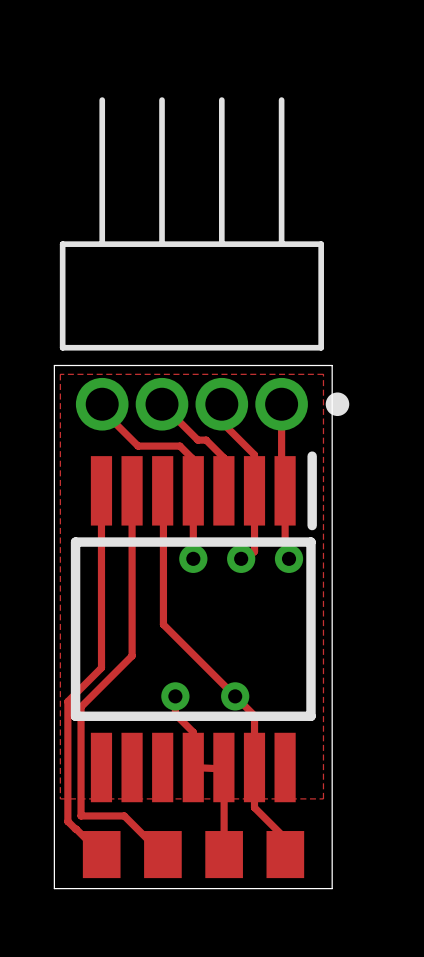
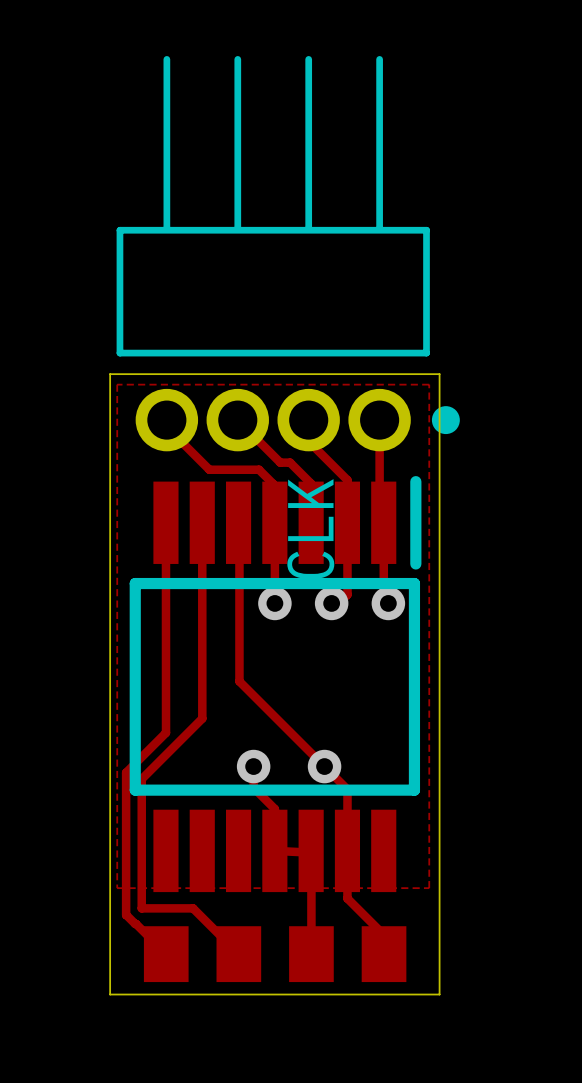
text: none -> CLK (310, 529)

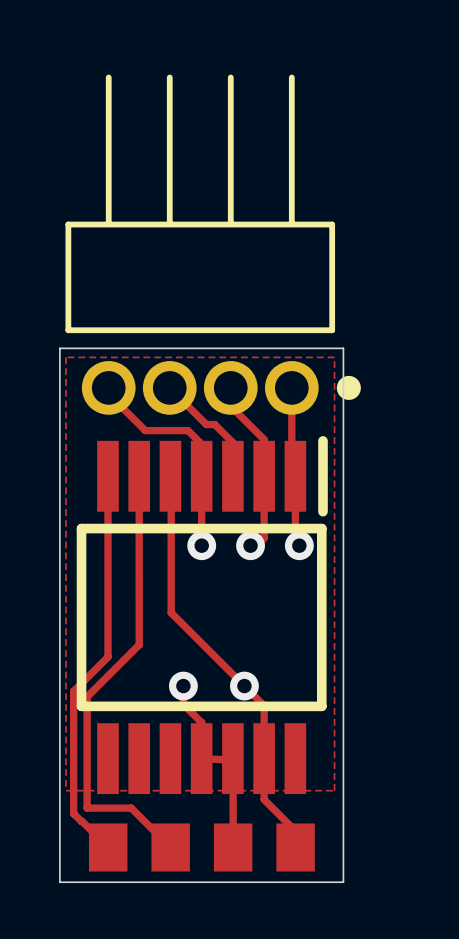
text: CLK (310, 529) -> none

